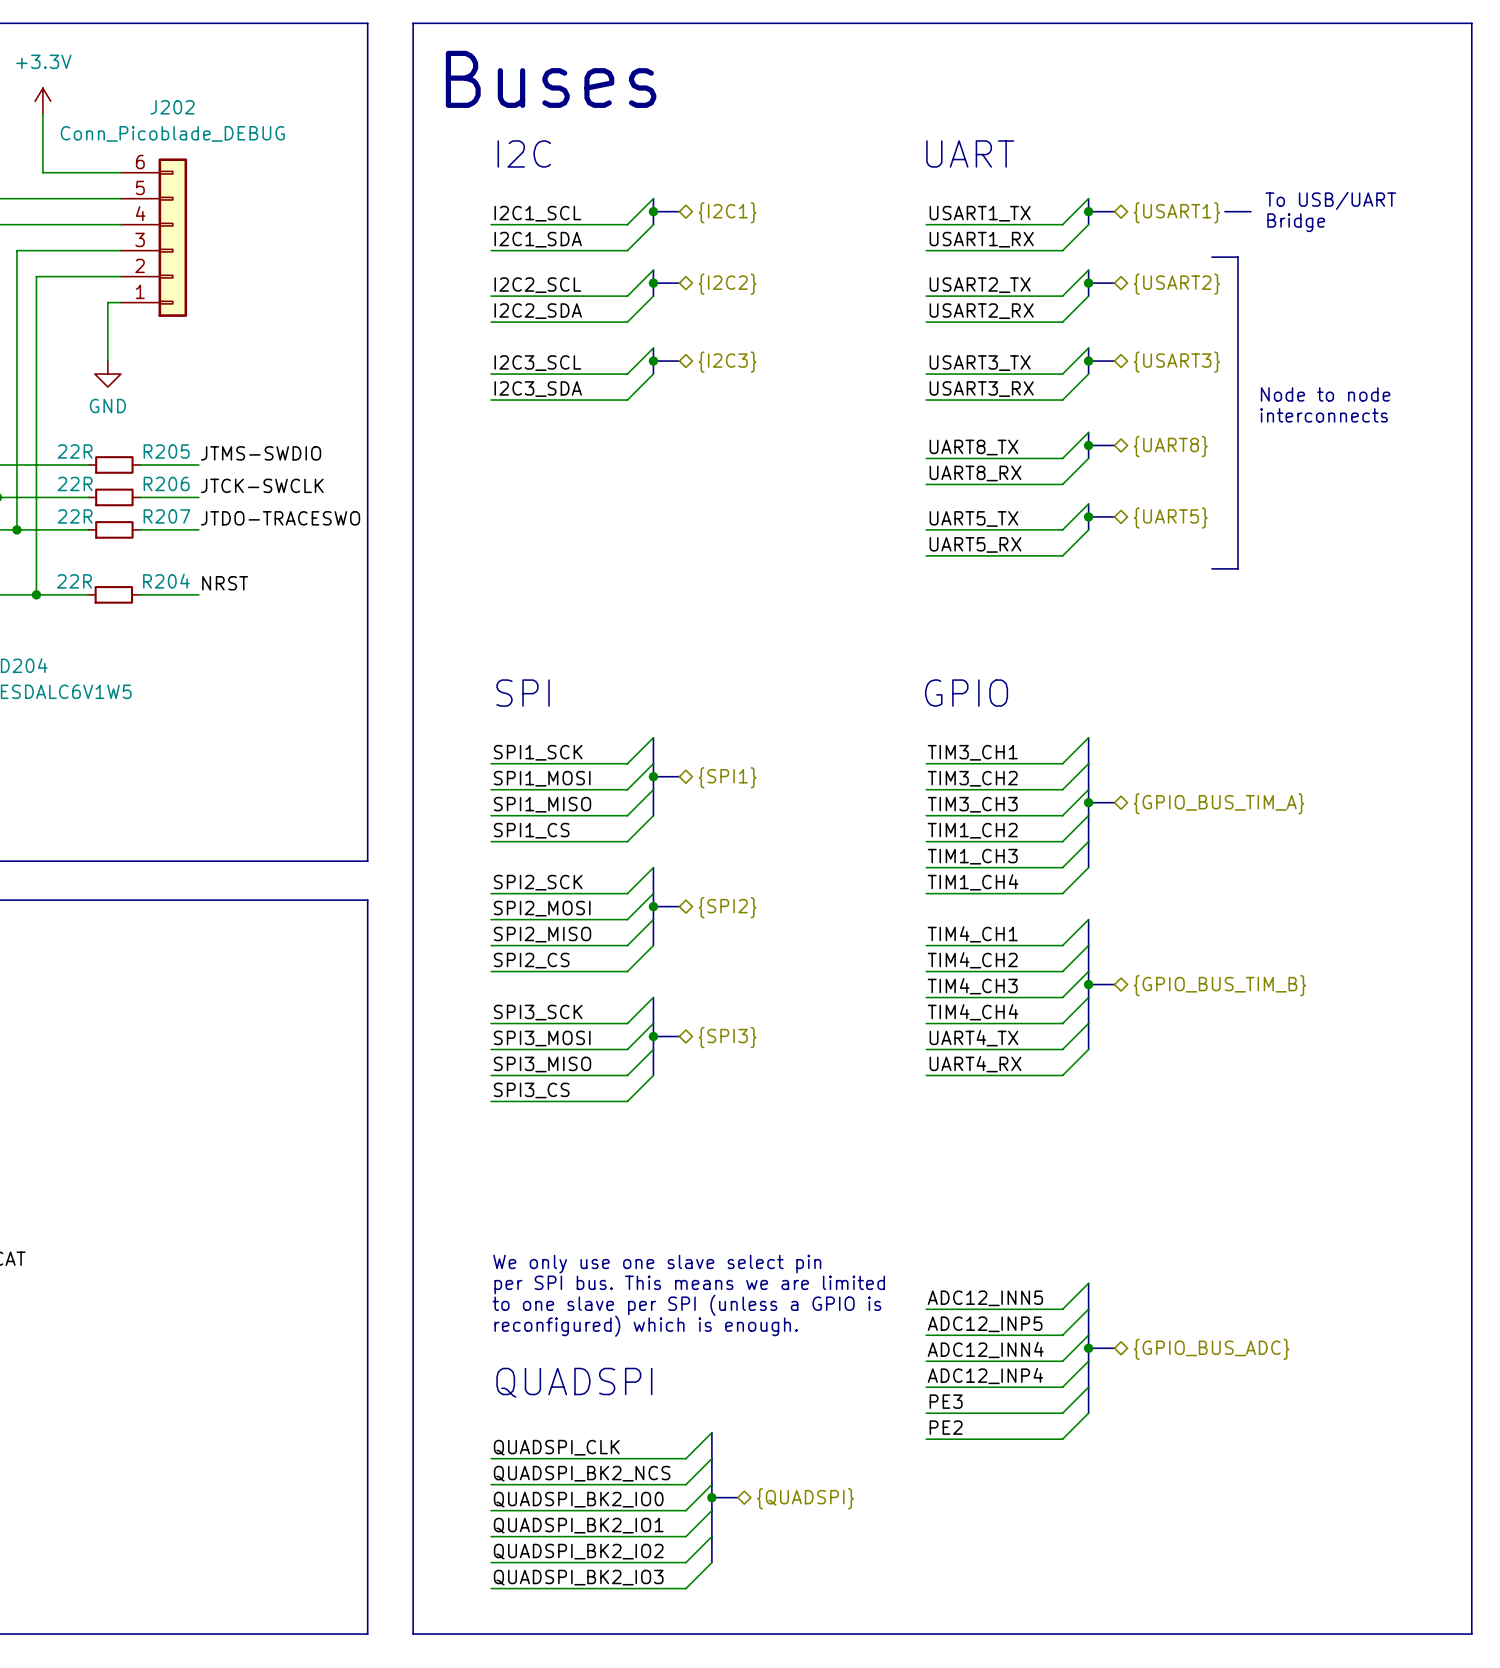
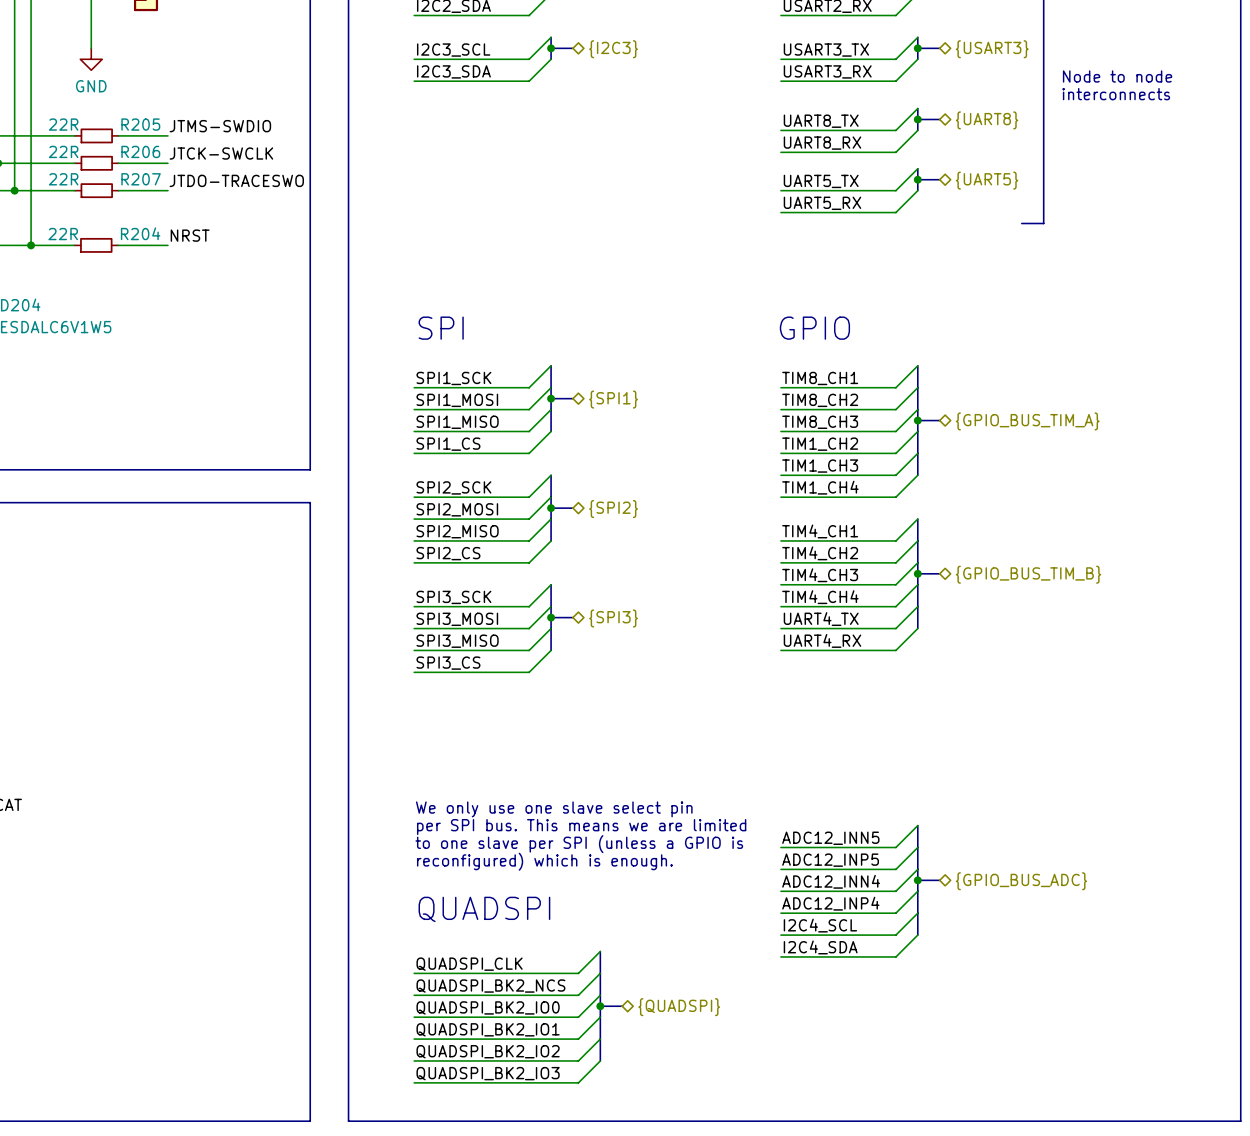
label: TIM3_CH1 (972, 752) -> TIM8_CH1 (820, 378)
label: TIM3_CH2 (972, 778) -> TIM8_CH2 (820, 400)
label: TIM3_CH3 (972, 804) -> TIM8_CH3 (820, 422)
label: PE3 (946, 1401) -> I2C4_SCL (820, 925)
label: PE2 (946, 1427) -> I2C4_SDA (820, 947)

